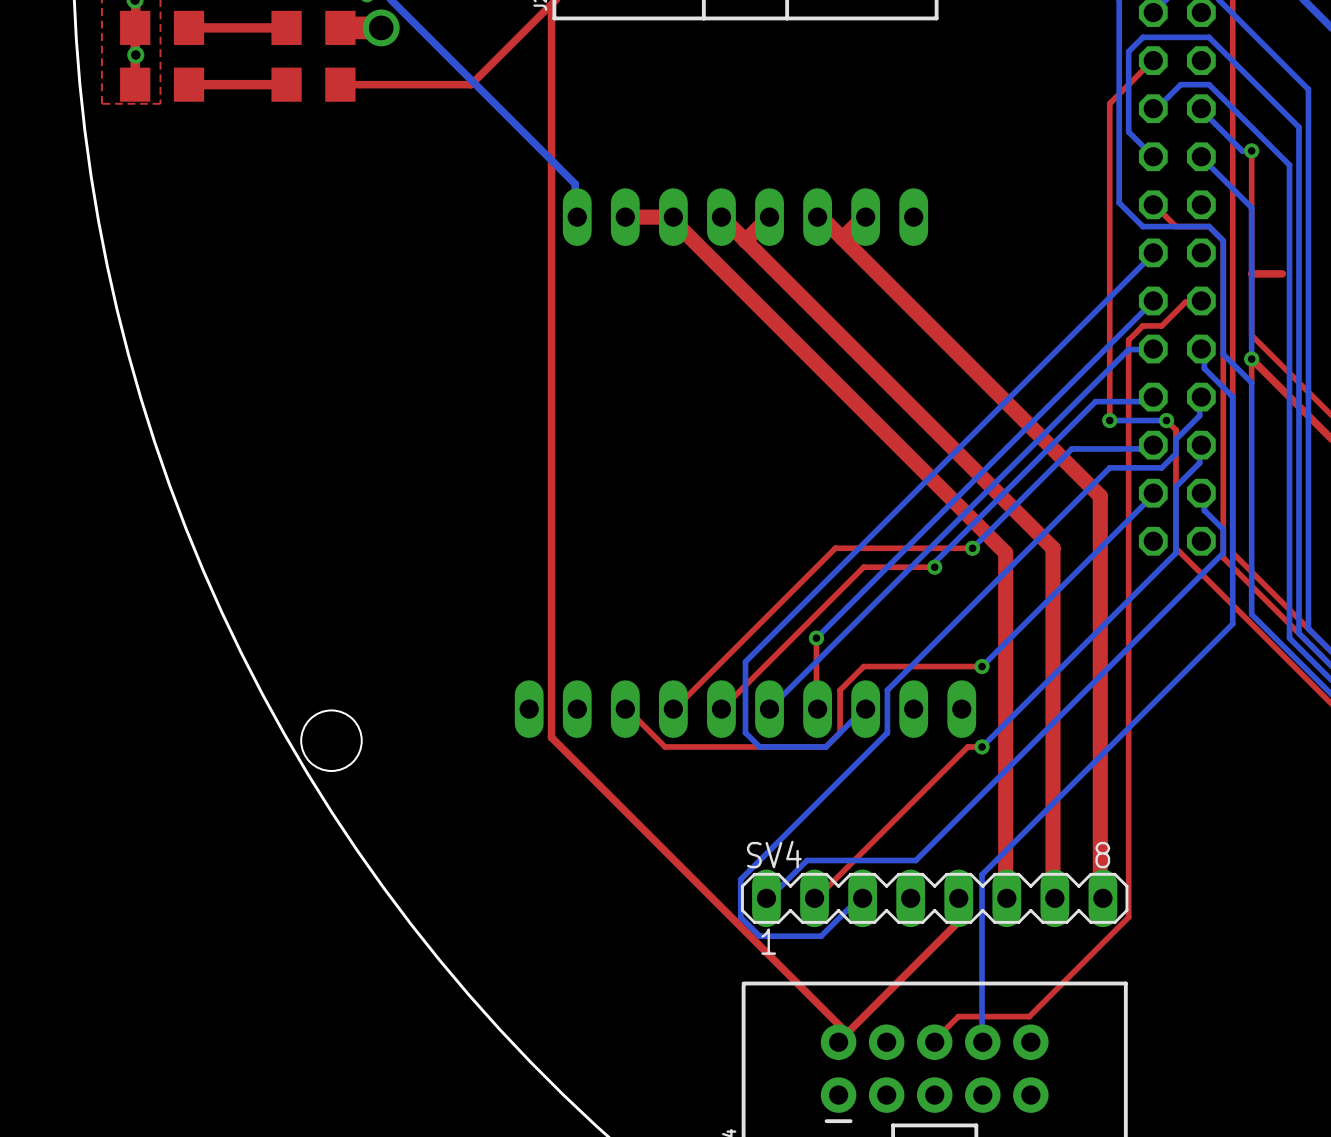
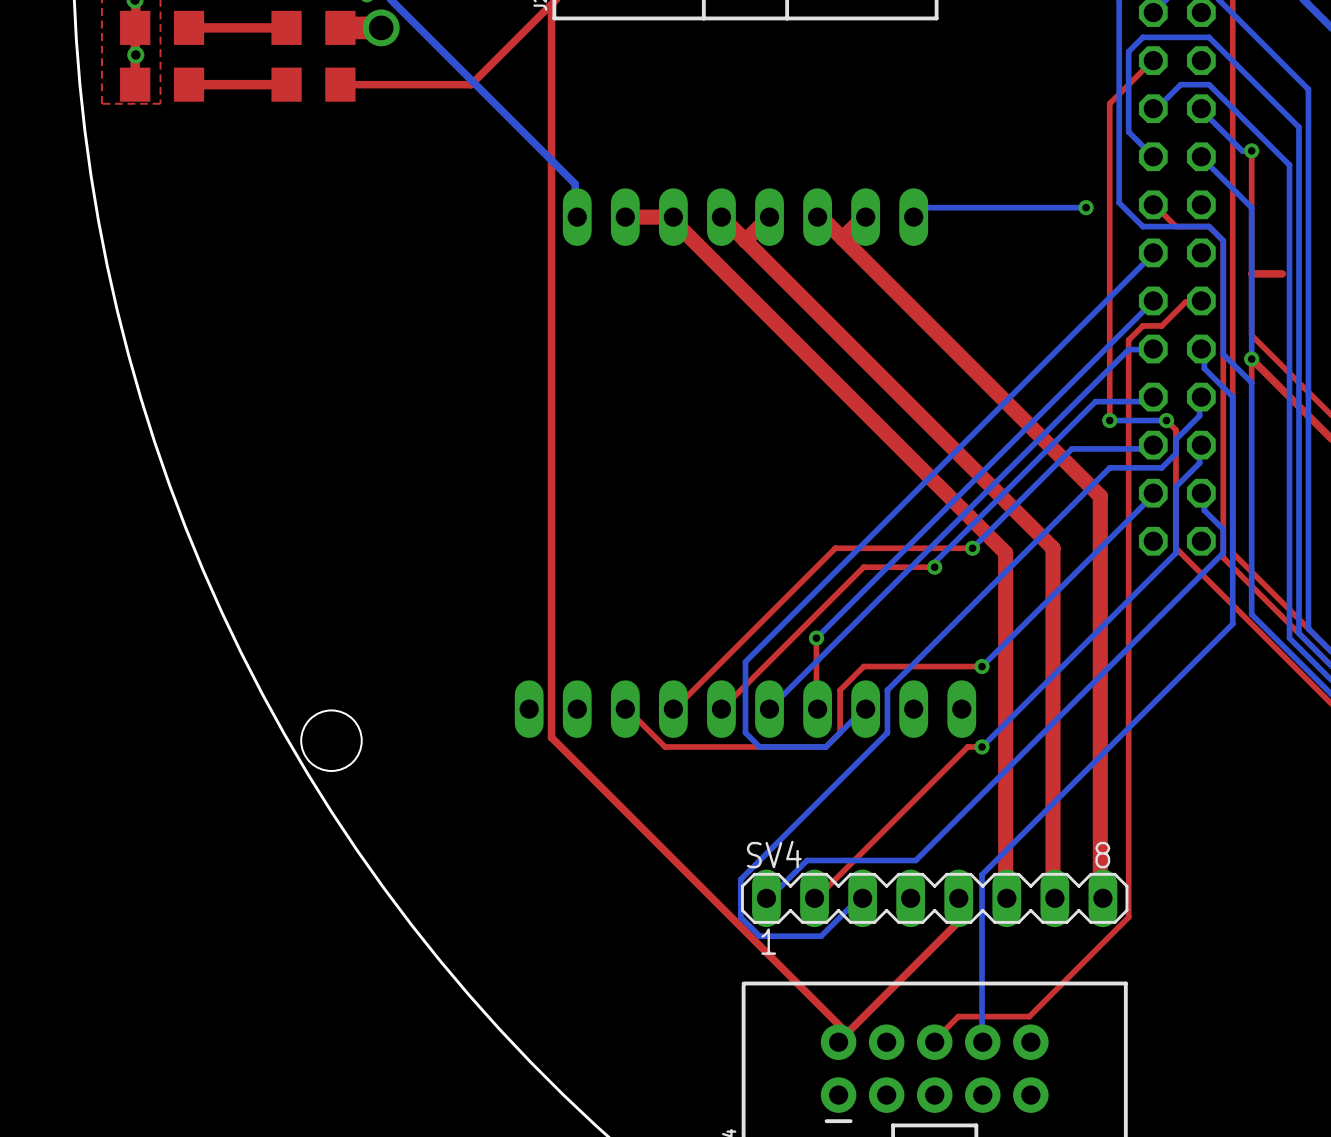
bottom track: none -> (1086, 207) (925, 207) (913, 217)
via: none -> (1086, 207)

